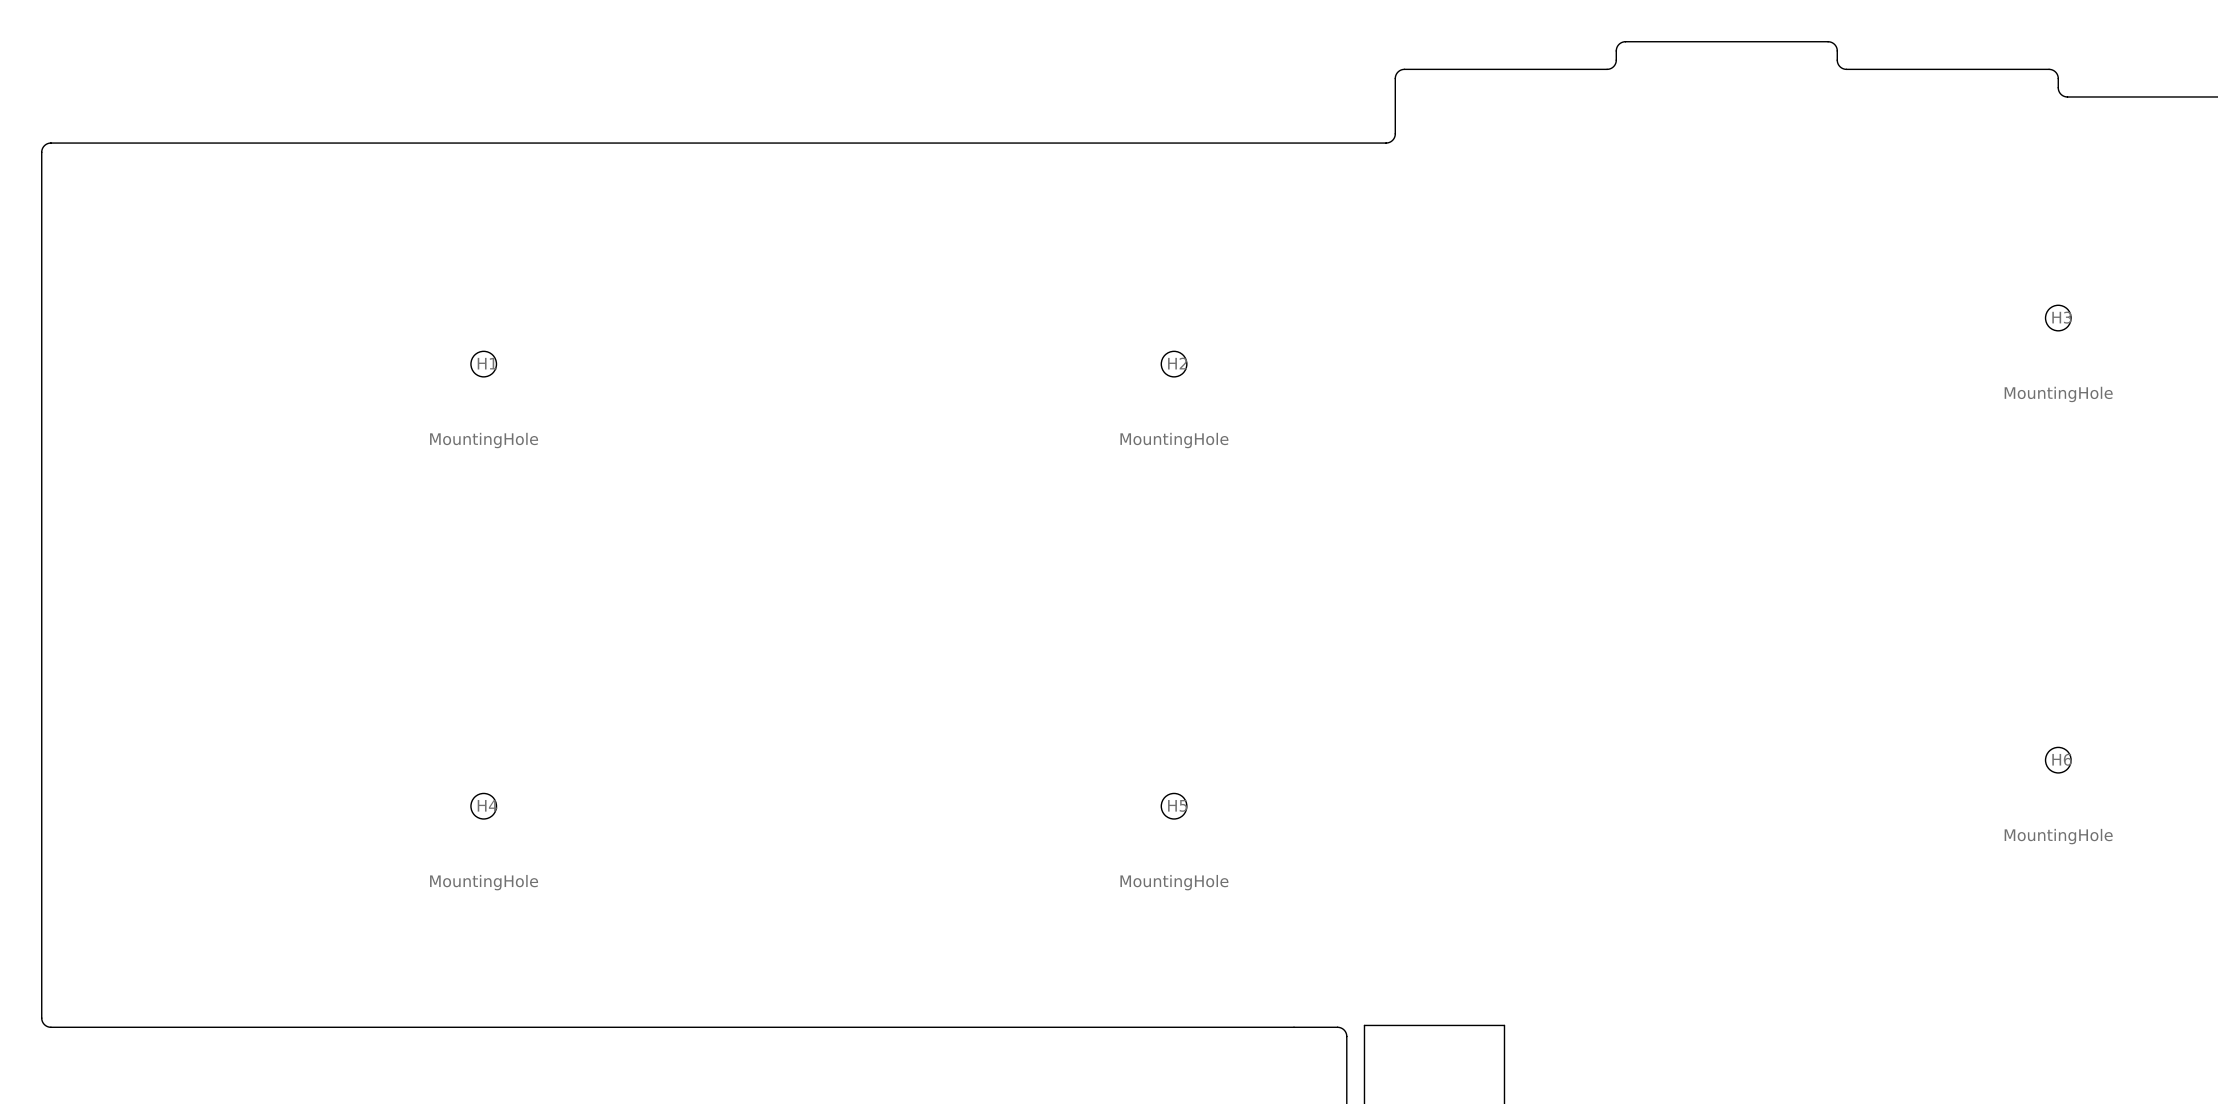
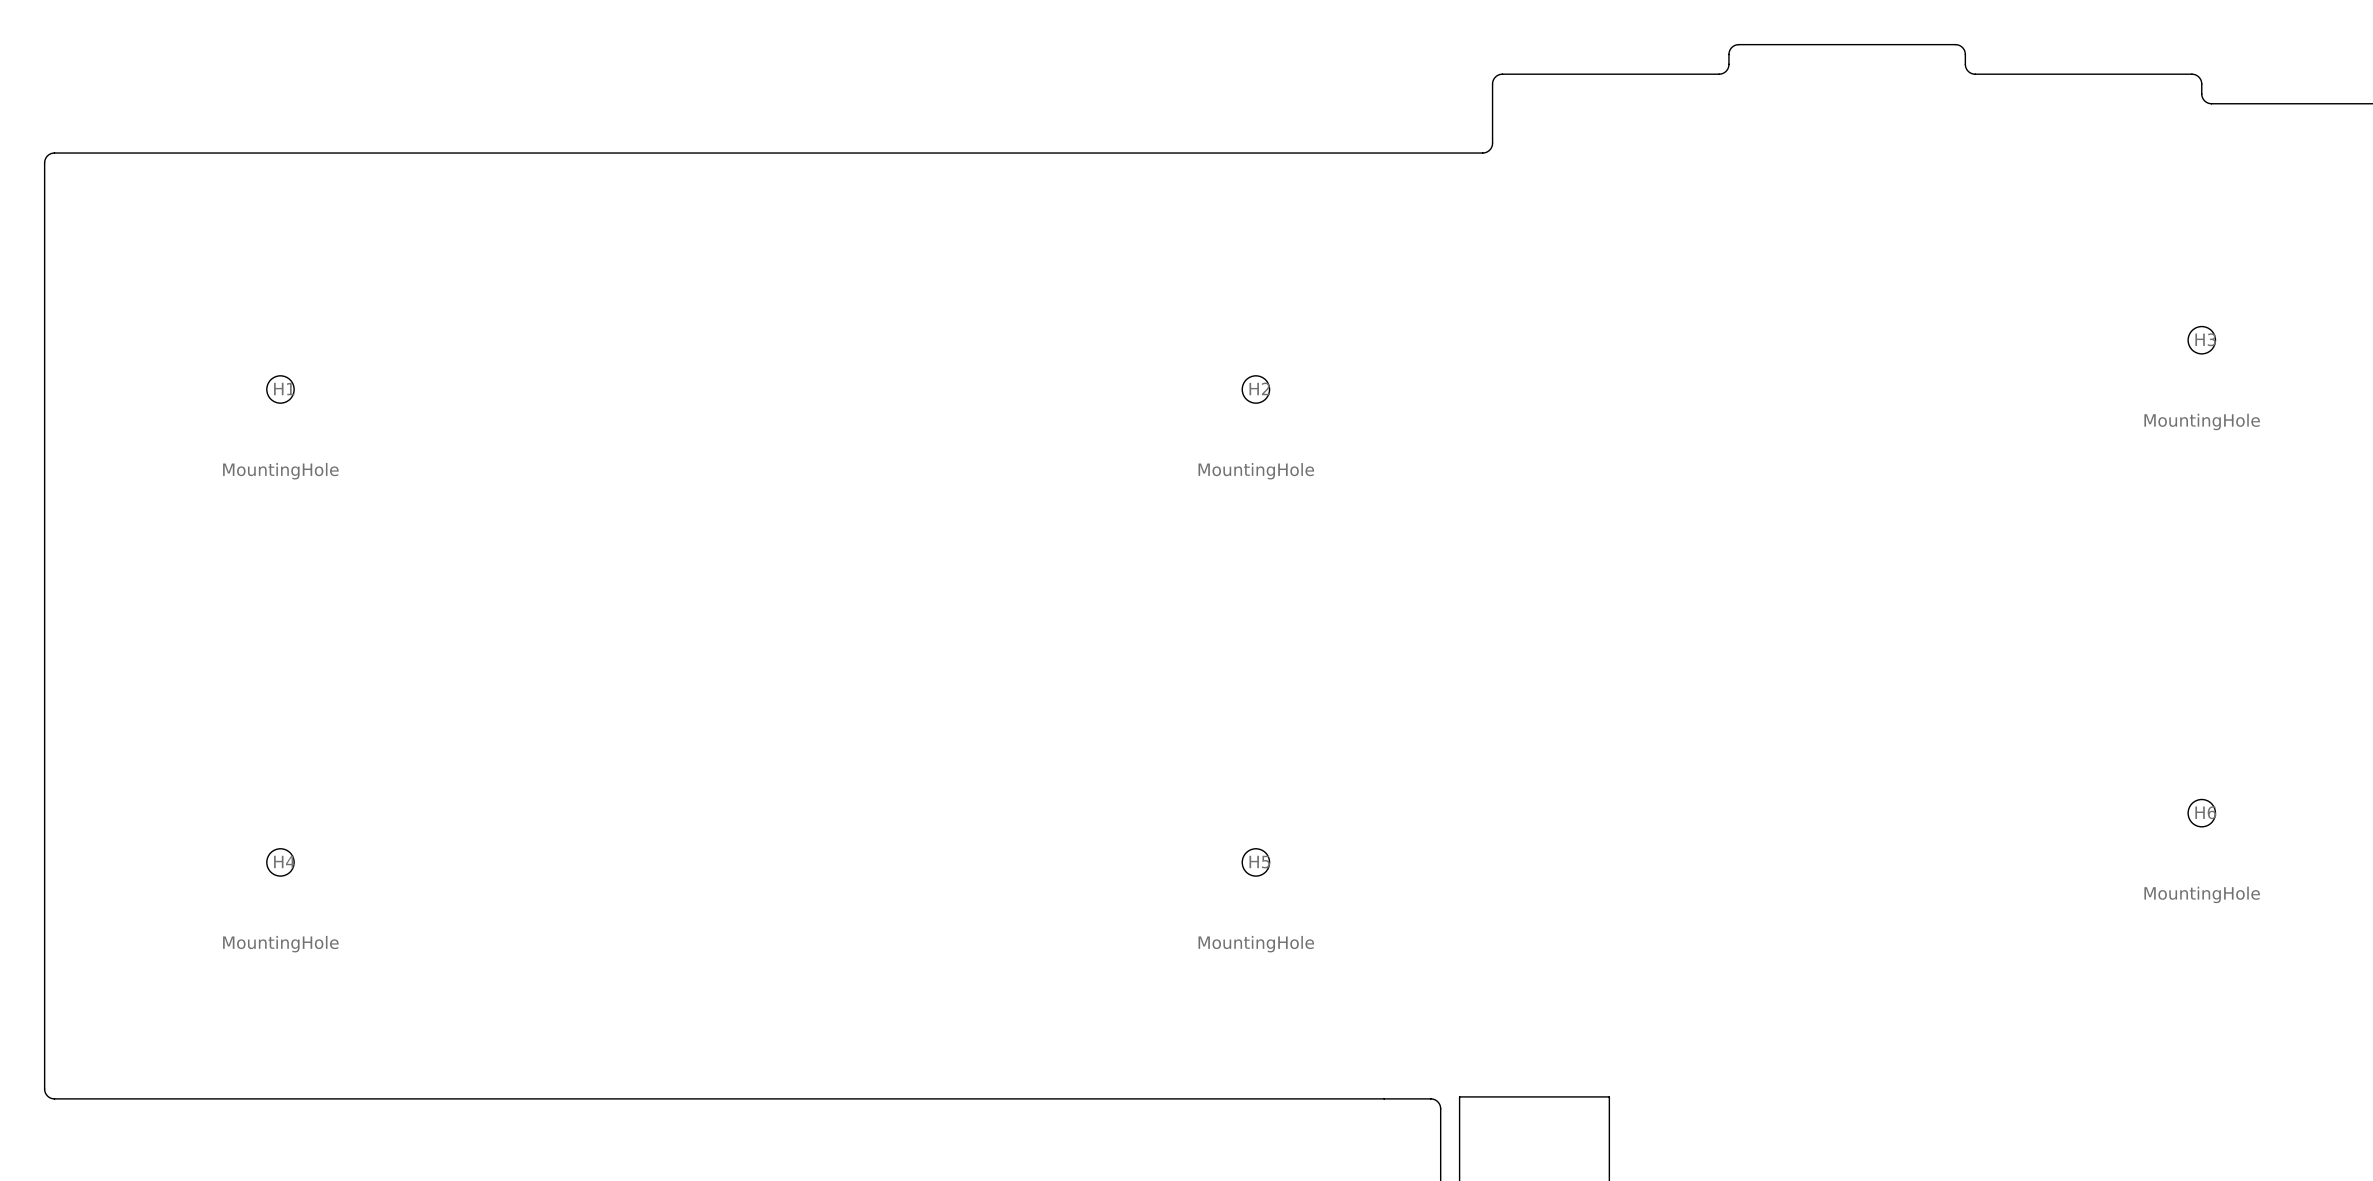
H1 position: (483, 364) -> (280, 389)
H4 position: (483, 806) -> (280, 862)

